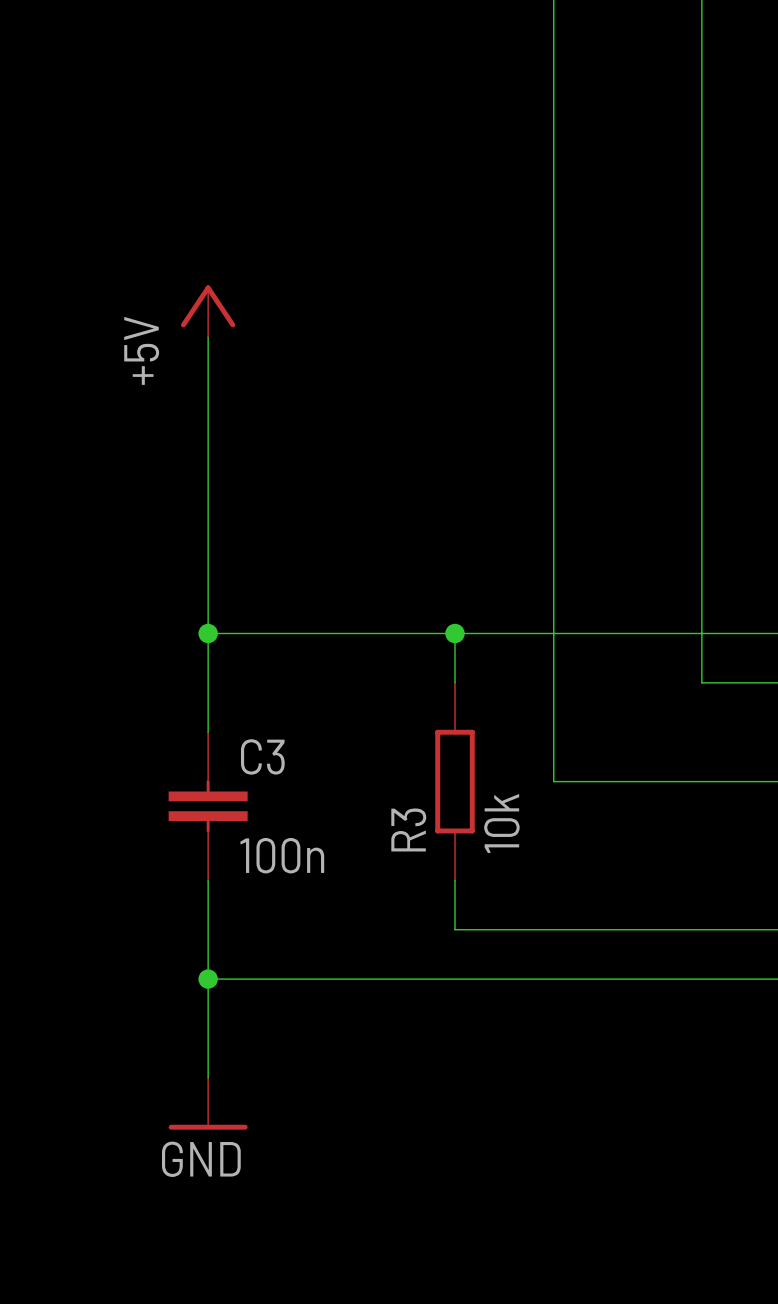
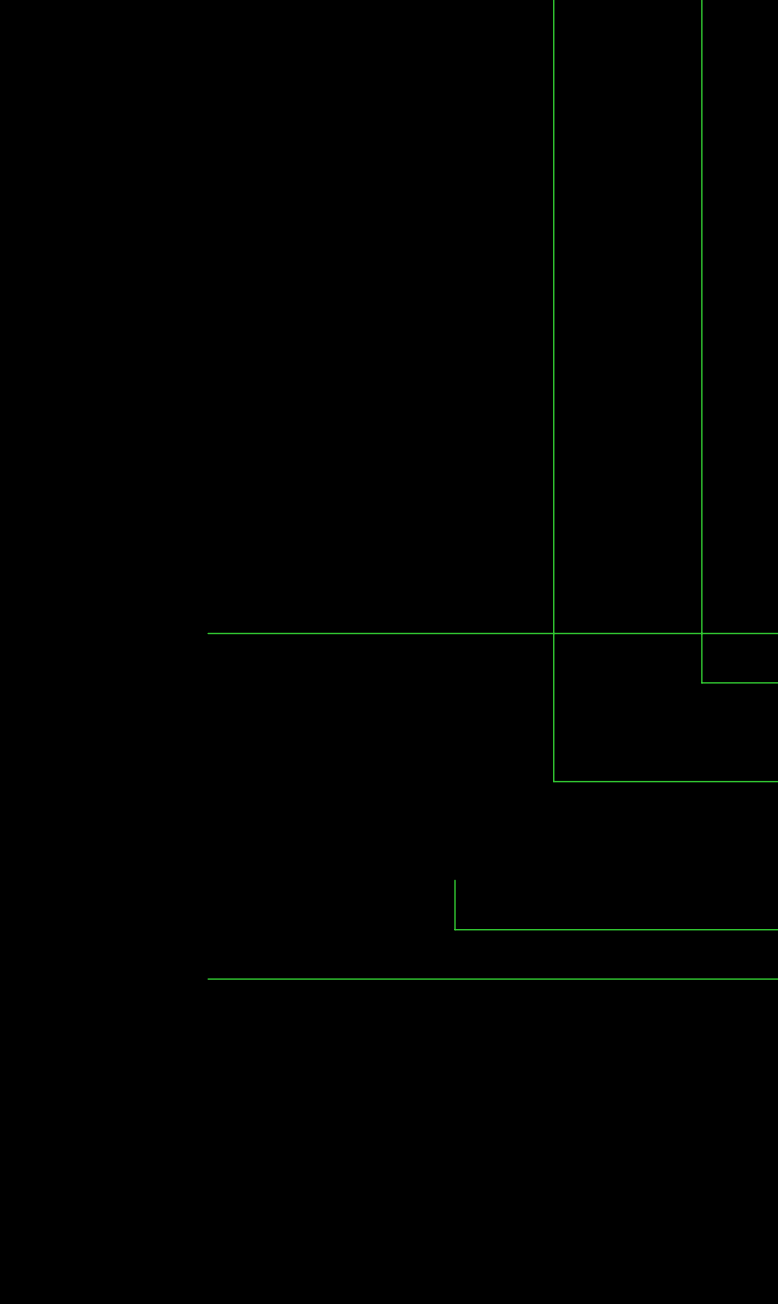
power symbol: +5V (208, 311) -> none
wire: (208, 337) (208, 732) -> none
junction: (208, 633) -> none
wire: (454, 633) (454, 682) -> none
junction: (454, 633) -> none
R3: 10k (454, 781) -> none
C3: 100n (208, 806) -> none
wire: (208, 880) (208, 1077) -> none
junction: (208, 979) -> none
power symbol: GND (208, 1103) -> none

